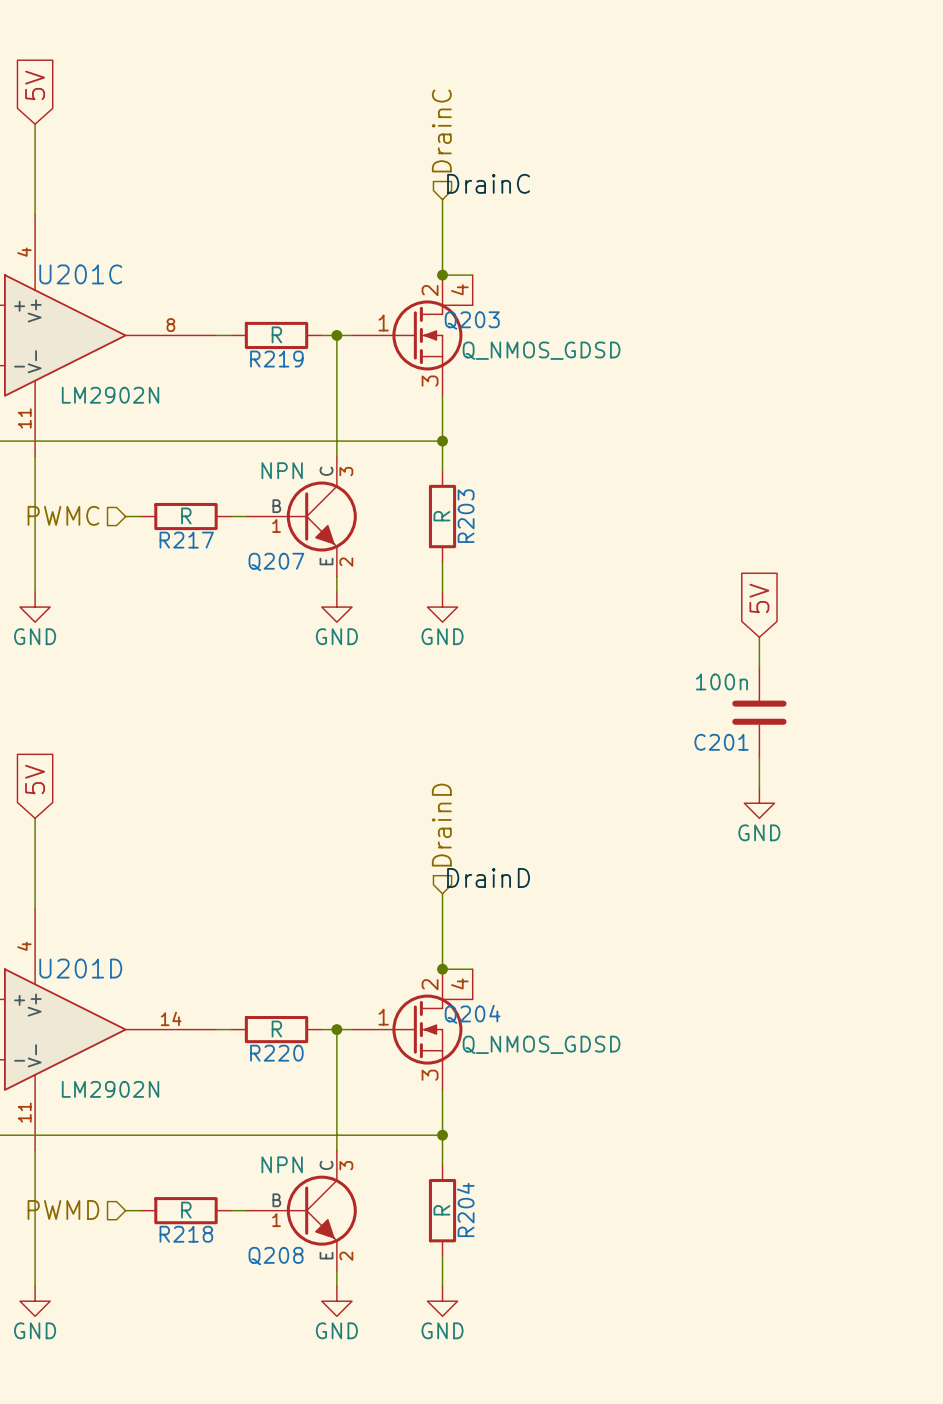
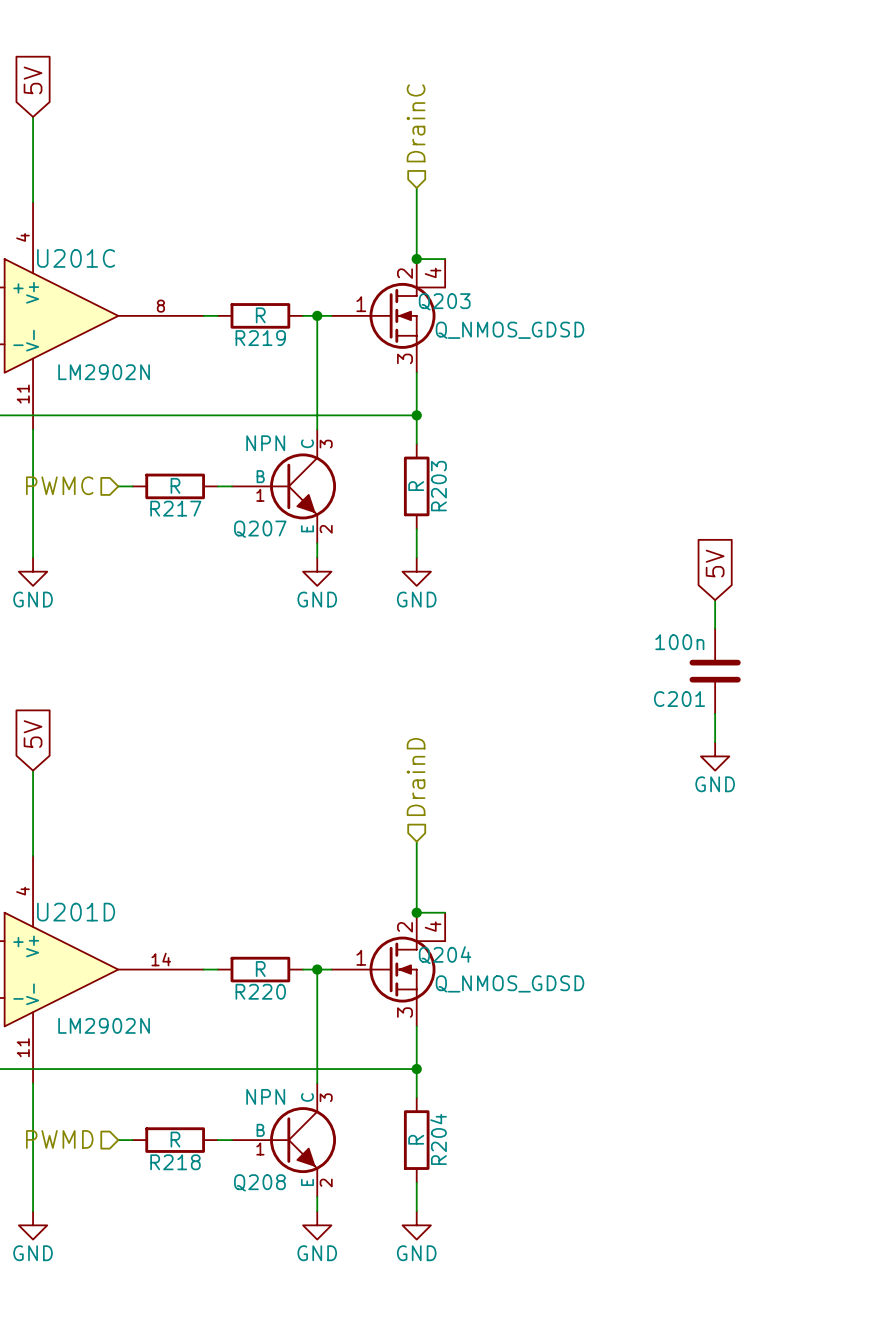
label: DrainC (488, 183) -> none
label: DrainD (488, 877) -> none

